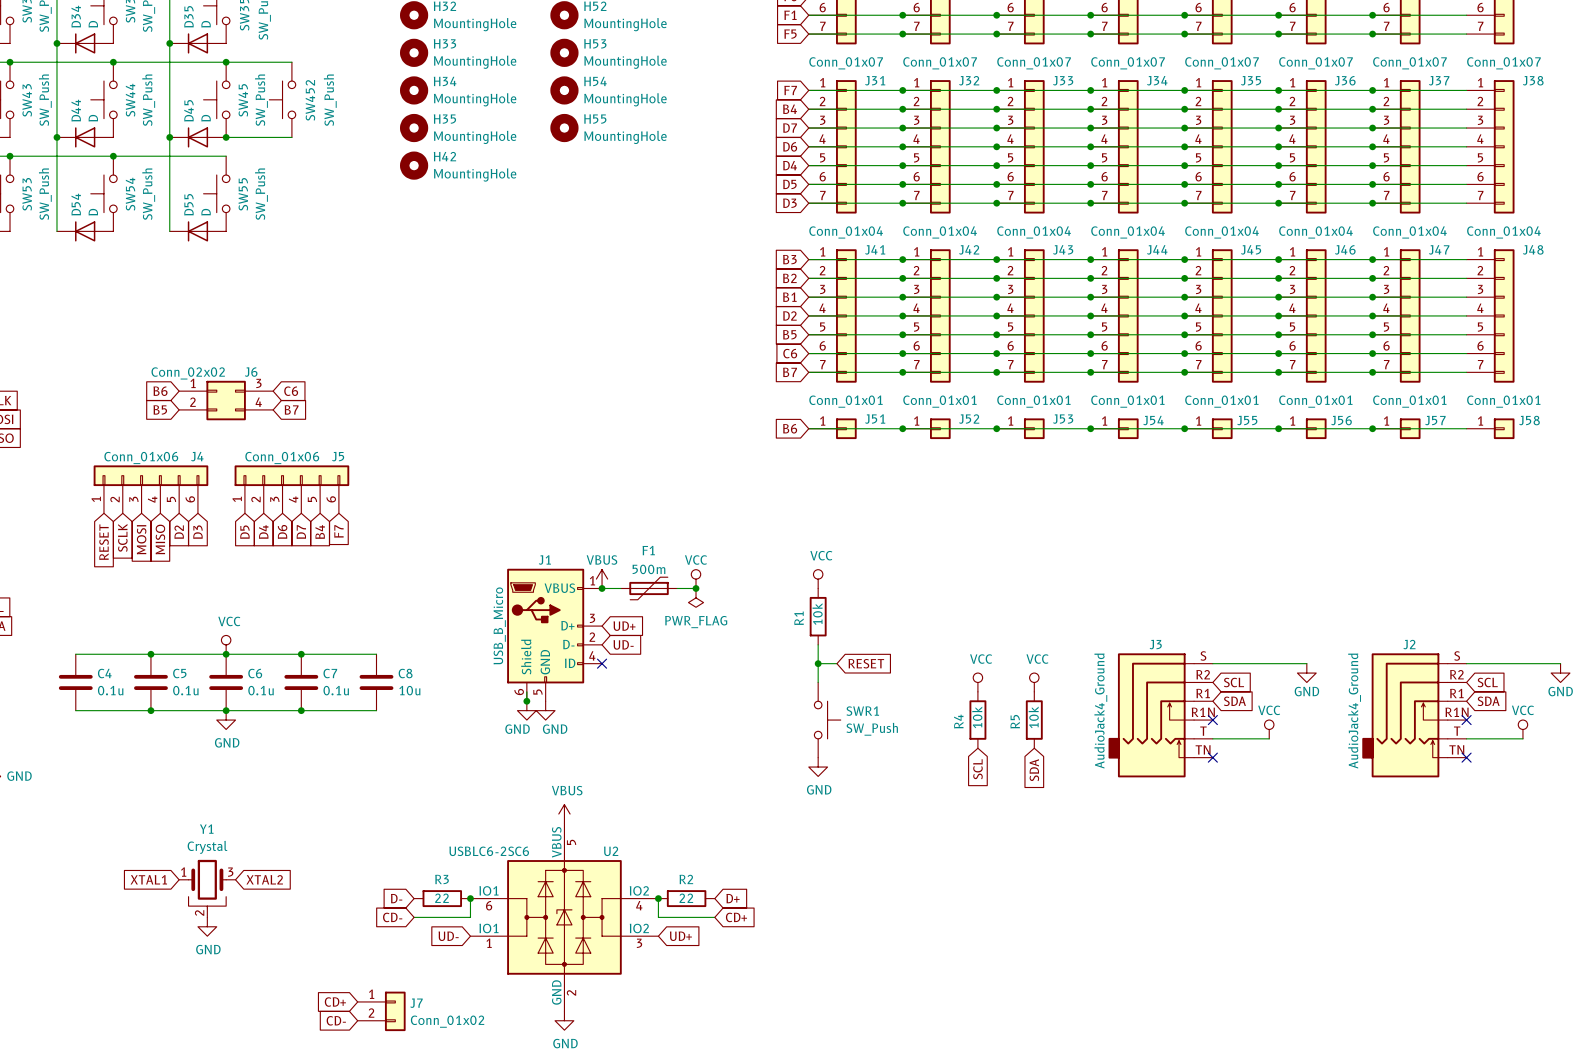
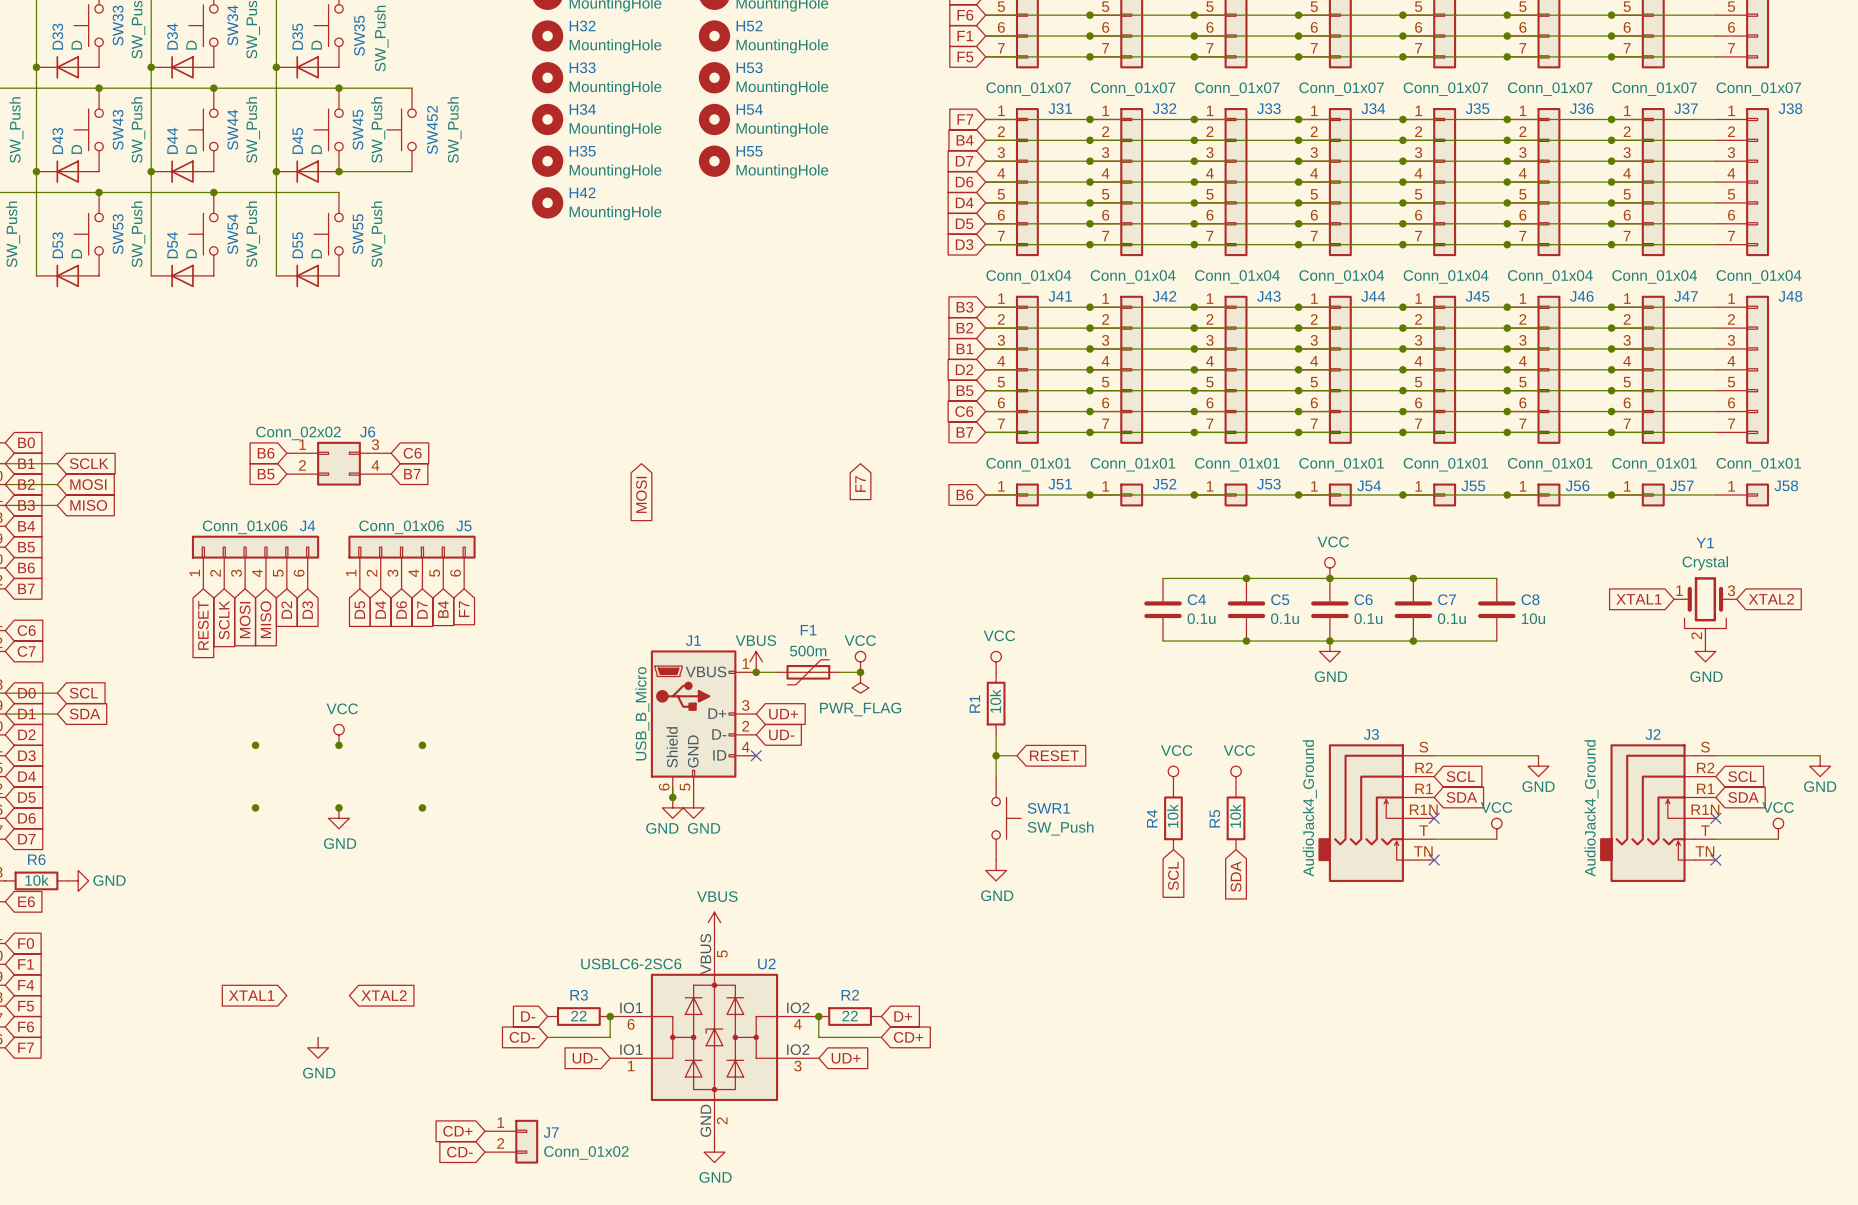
global label: none -> F7 (860, 484)
global label: none -> MOSI (641, 494)
power symbol: none -> VCC (1329, 568)
wire: none -> (1163, 578) (1496, 578)
junction: none -> (1246, 578)
junction: none -> (1329, 578)
junction: none -> (1413, 578)
global label: none -> XTAL1 (1639, 599)
global label: none -> XTAL2 (1771, 599)
wire: none -> (1163, 641) (1496, 641)
junction: none -> (1246, 641)
junction: none -> (1329, 641)
junction: none -> (1413, 641)
power symbol: none -> GND (1329, 651)
power symbol: none -> GND (1705, 651)
wire: (75, 654) (376, 654) -> none
C4 position: (75, 682) -> (1163, 609)
C5 position: (150, 682) -> (1246, 609)
C6 position: (226, 682) -> (1329, 609)
C7 position: (301, 682) -> (1413, 609)
C8 position: (376, 682) -> (1496, 609)
wire: (75, 710) (376, 710) -> none
Y1 position: (207, 888) -> (1705, 609)

